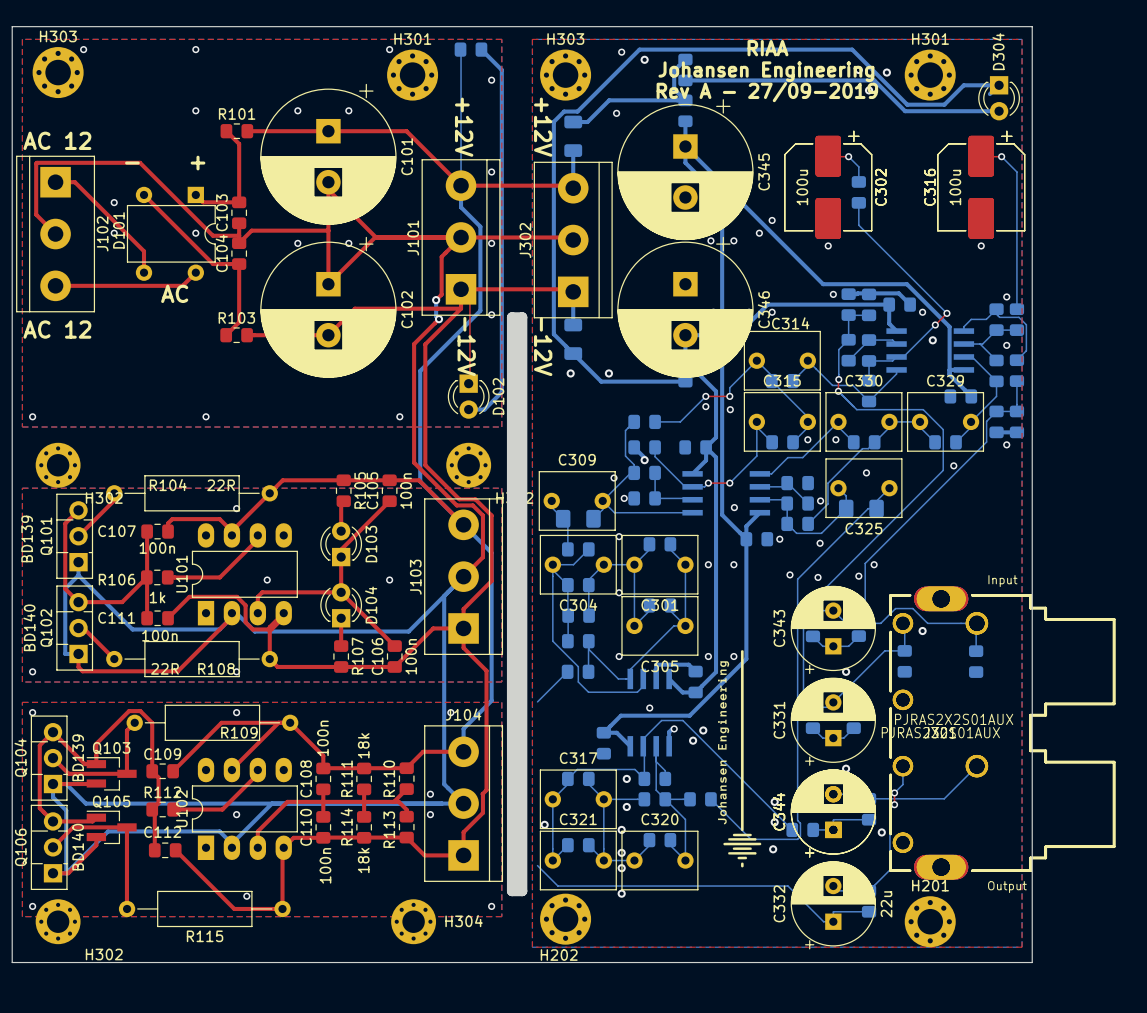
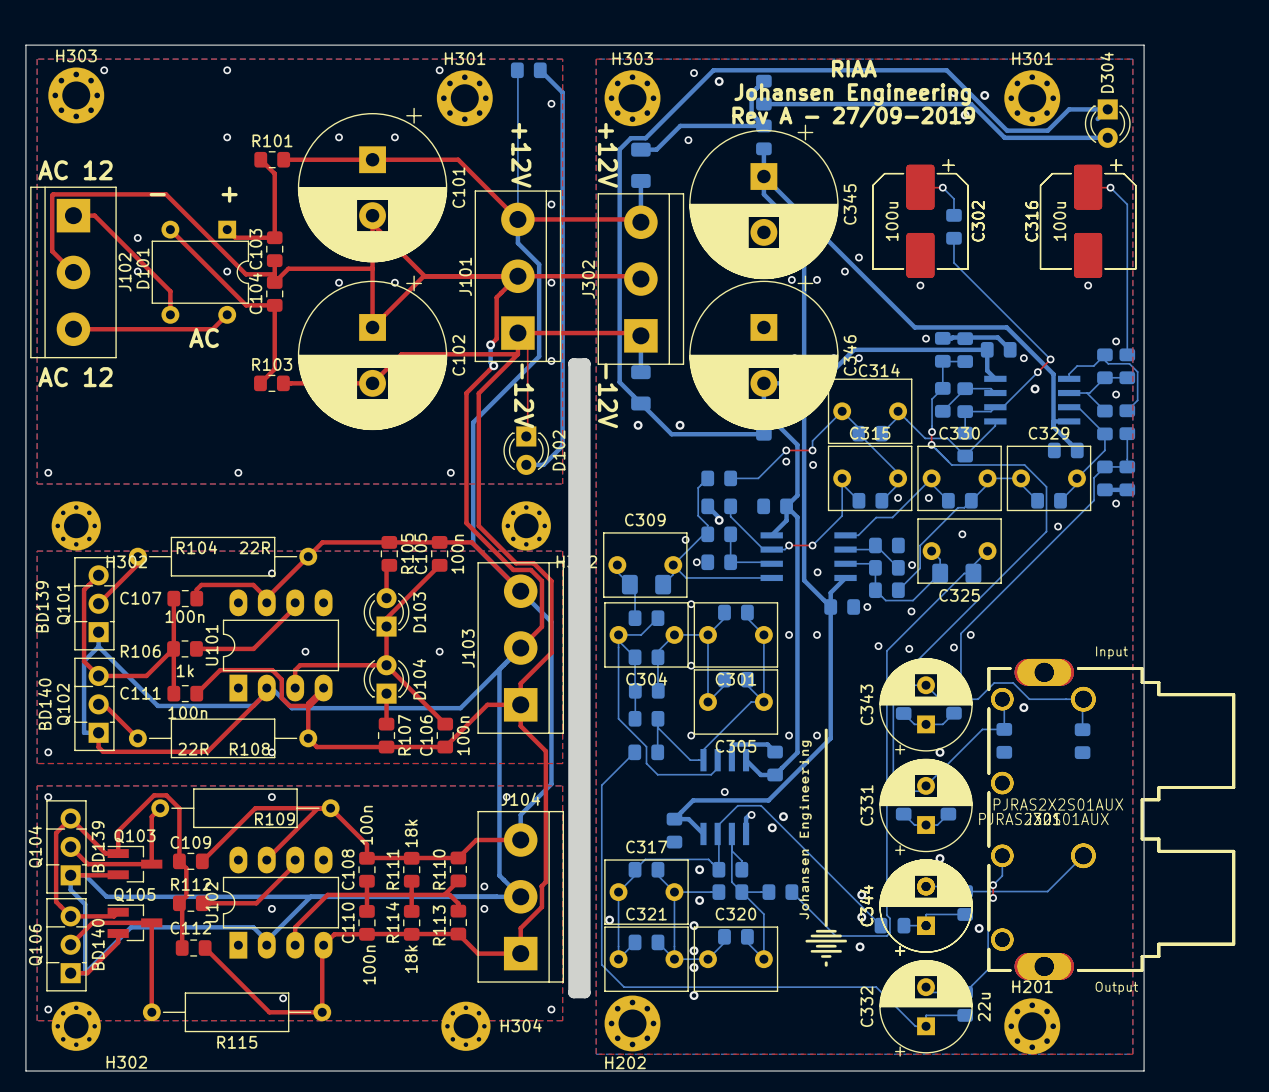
bottom track: none -> (601, 785) (601, 964)

